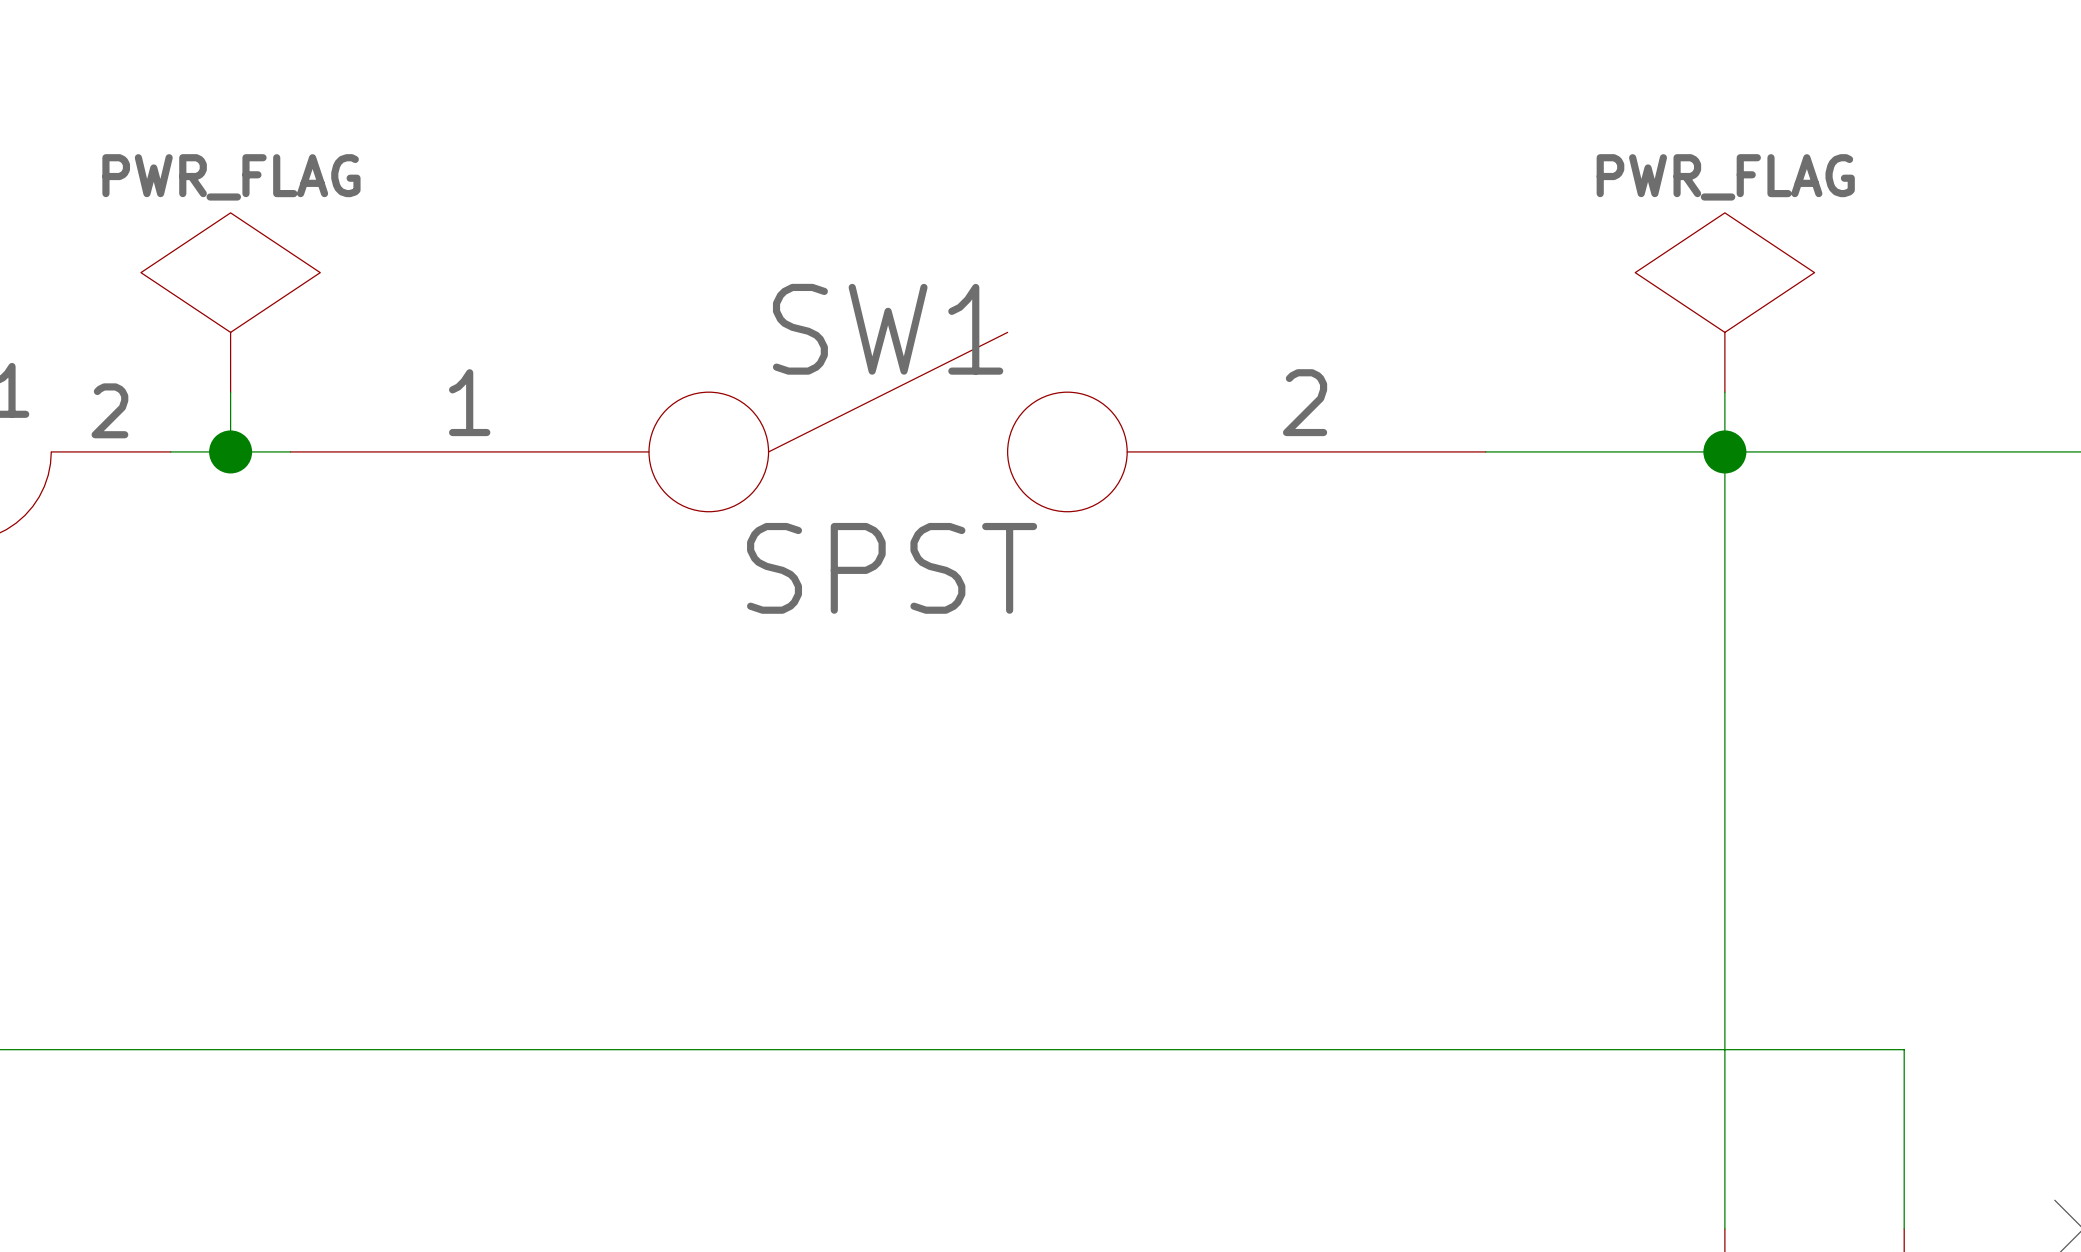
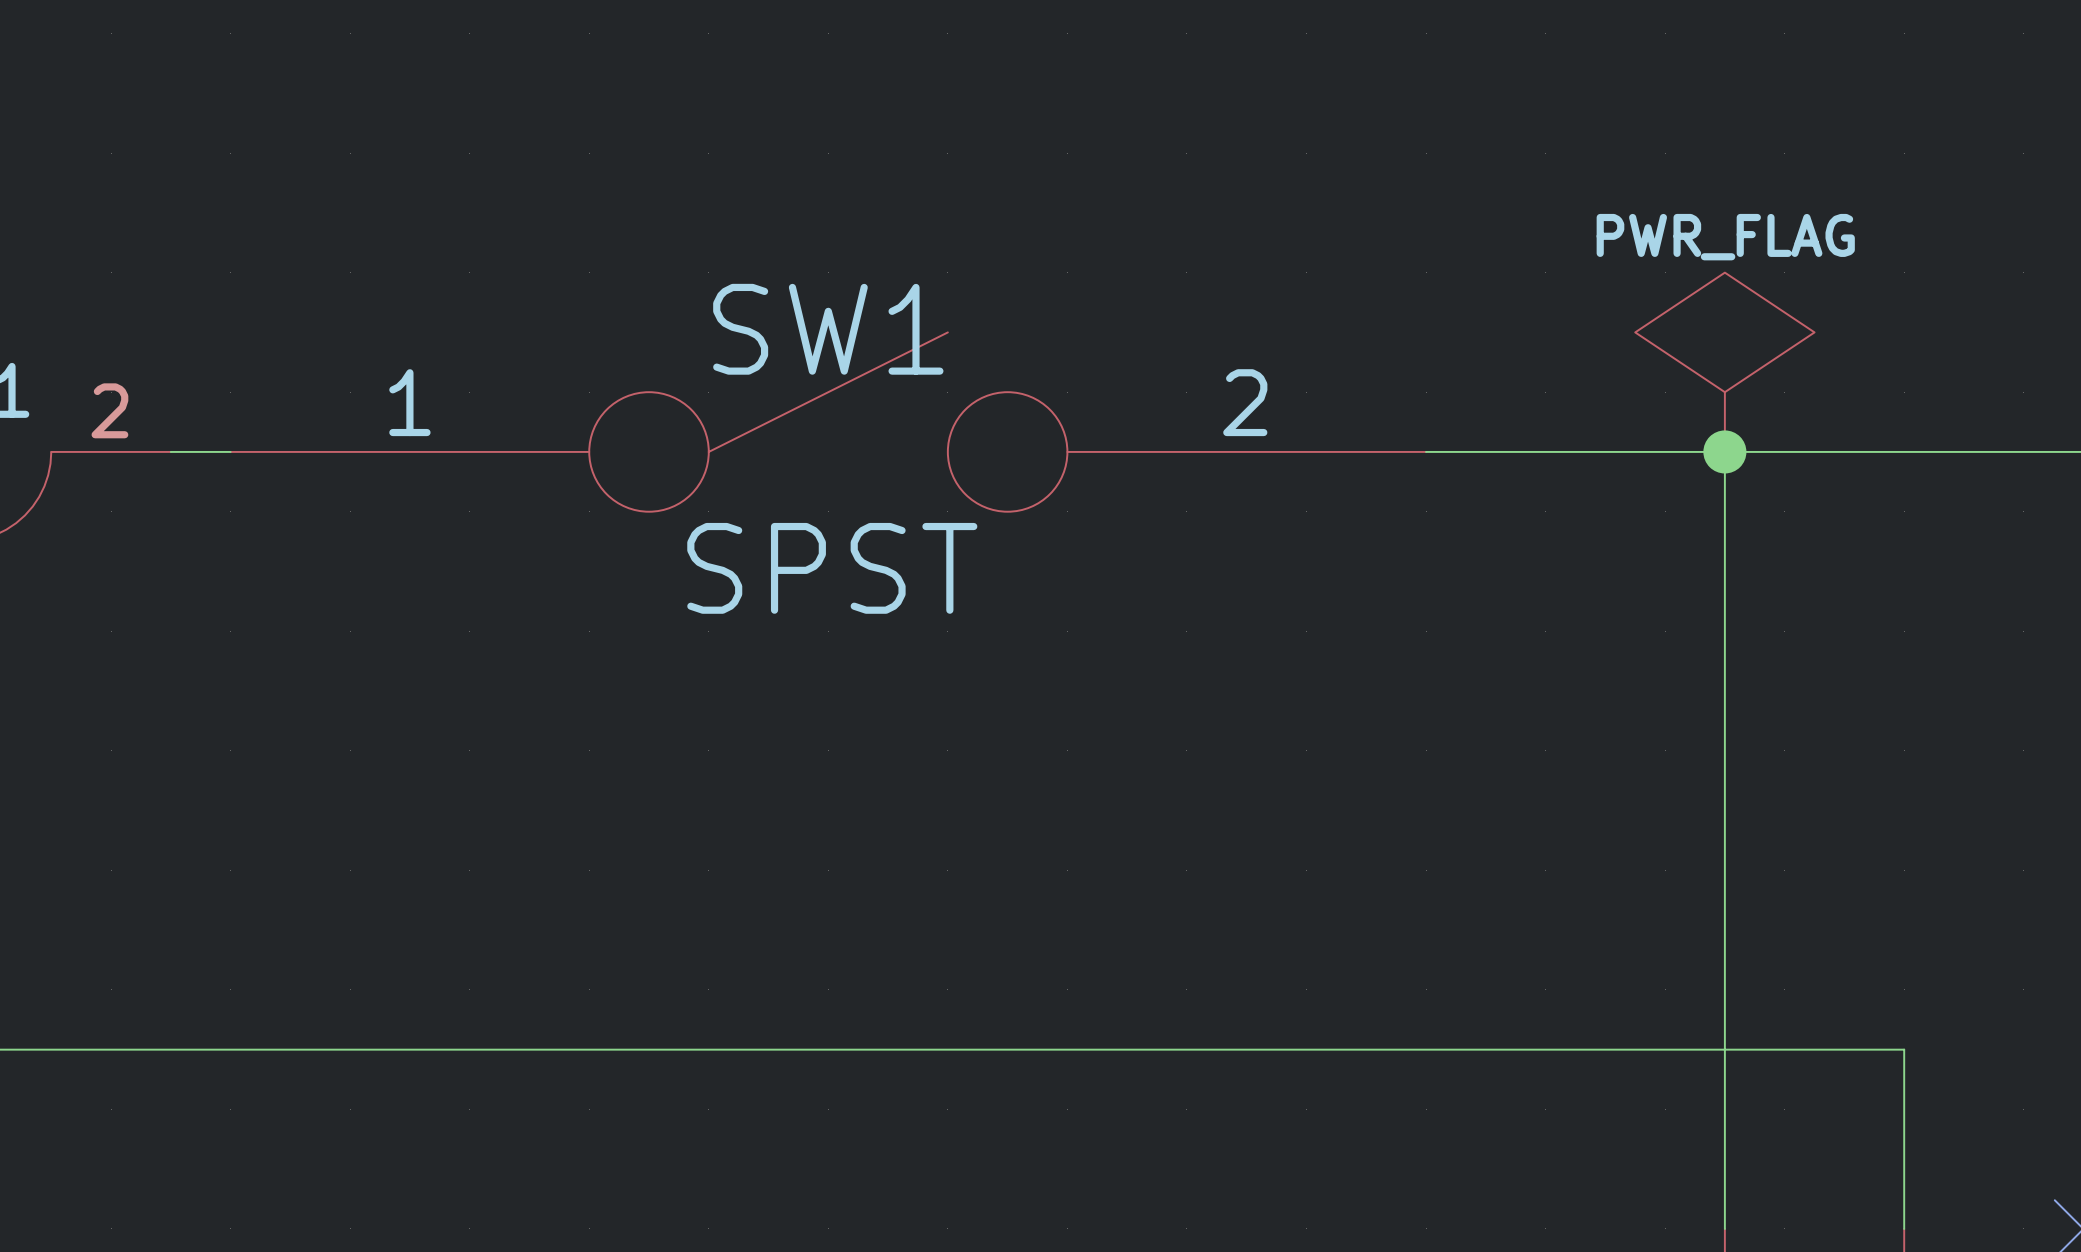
power symbol: PWR_FLAG (230, 302) -> none
power symbol position: PWR_FLAG (1724, 302) -> PWR_FLAG (1724, 362)
wire: (230, 392) (230, 451) (290, 451) -> none
SW1 position: (888, 422) -> (828, 422)
junction: (230, 451) -> none

